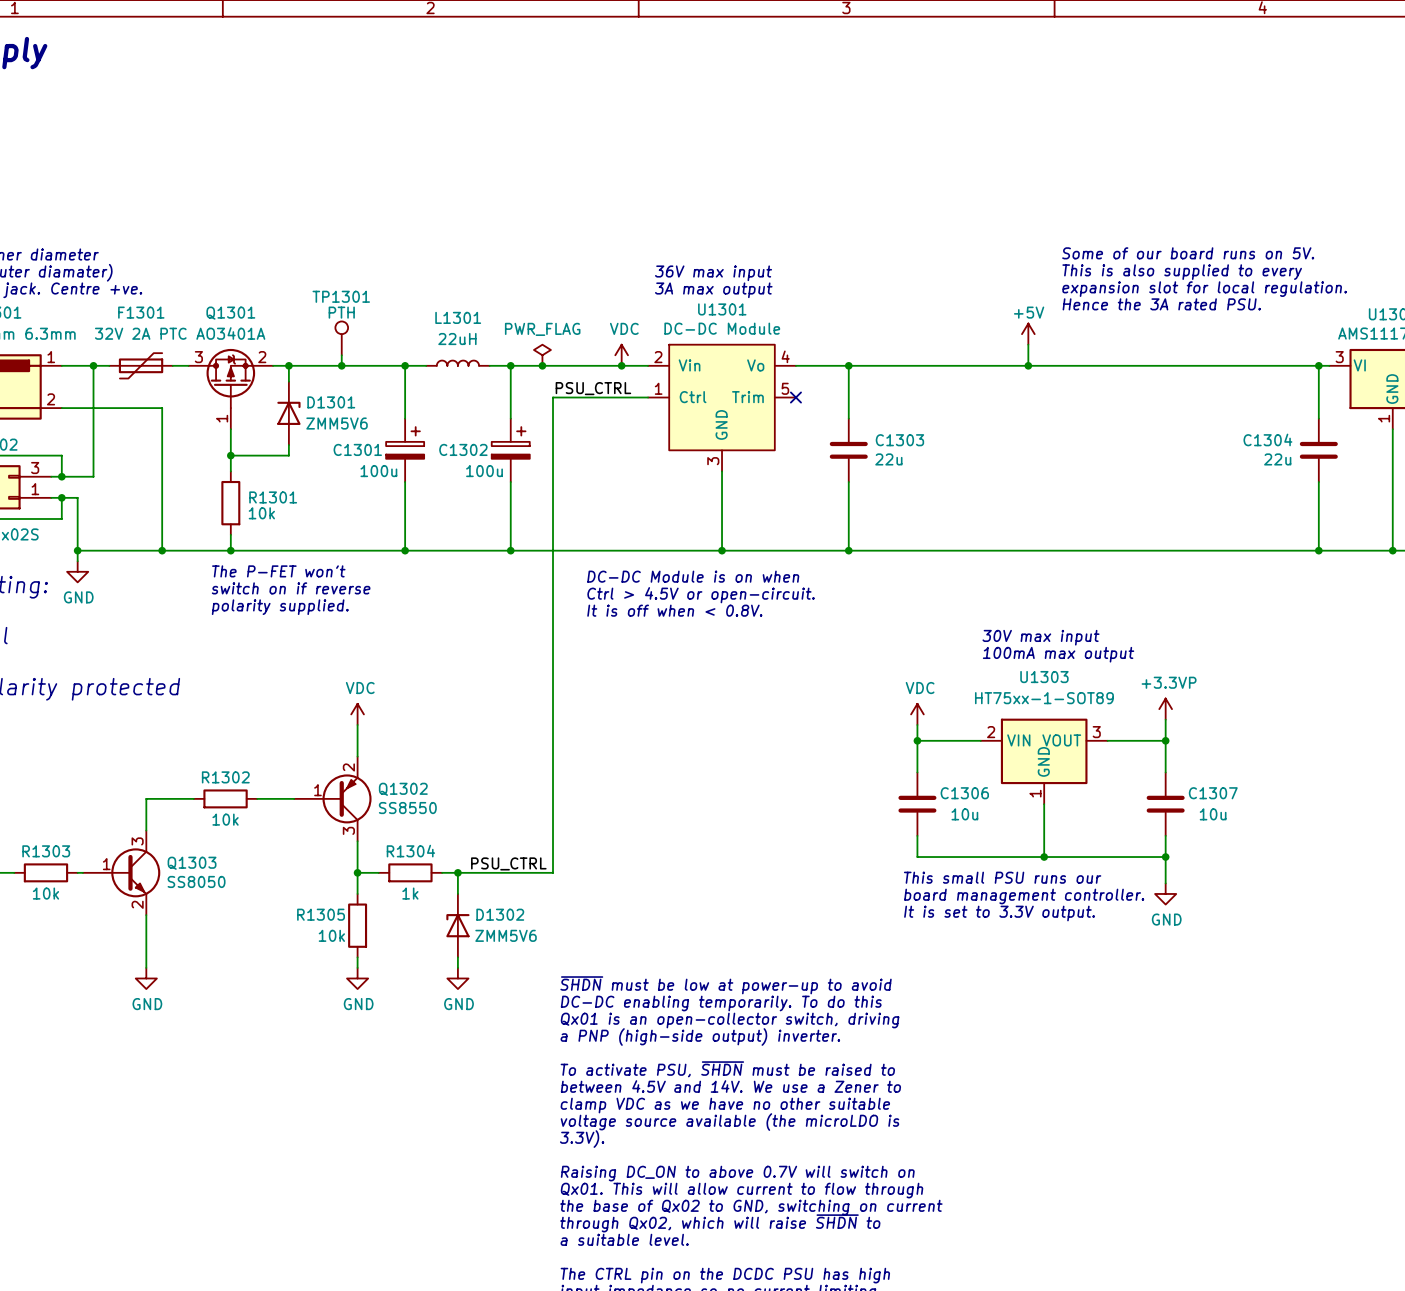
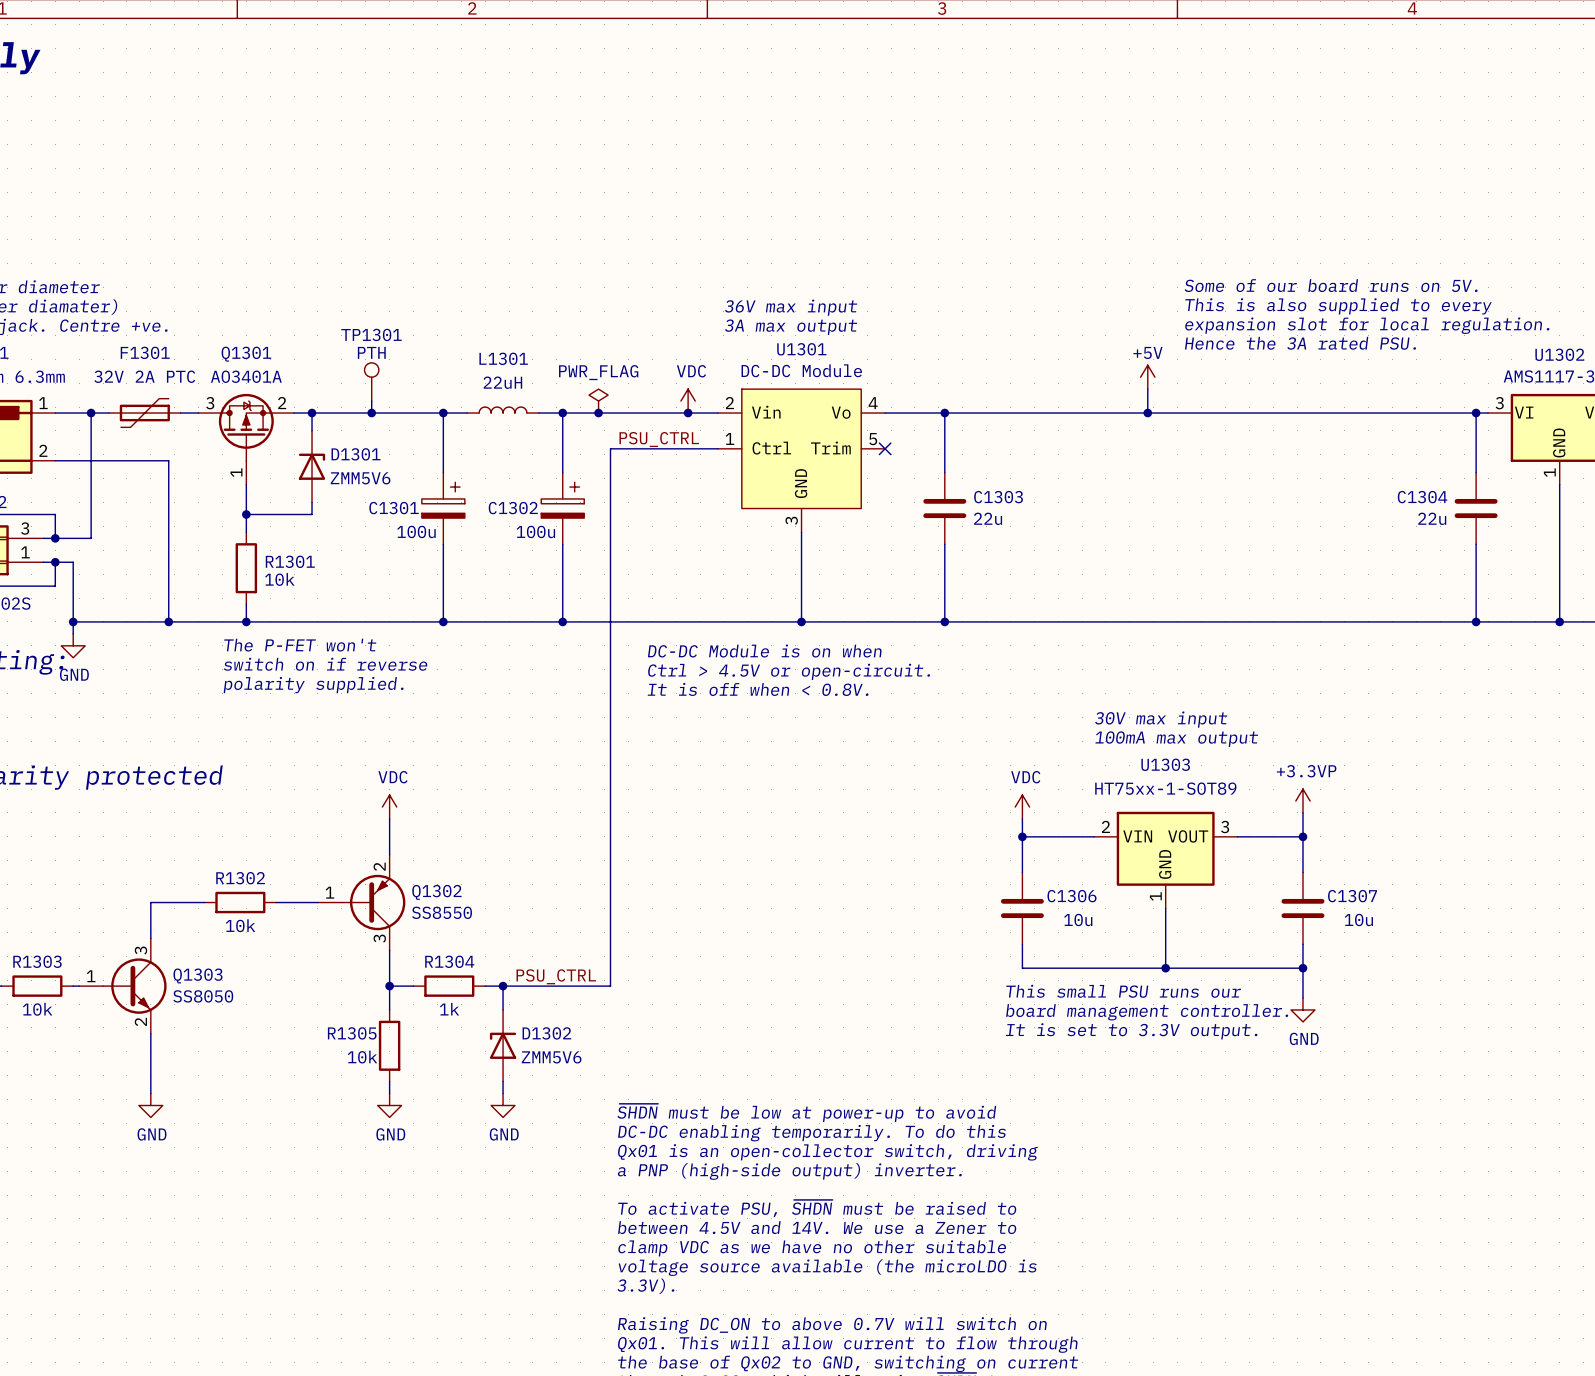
Q1302 symbol: [294, 756, 372, 842] -> [317, 854, 406, 951]
Q1303 symbol: [82, 830, 161, 916] -> [79, 938, 167, 1034]

